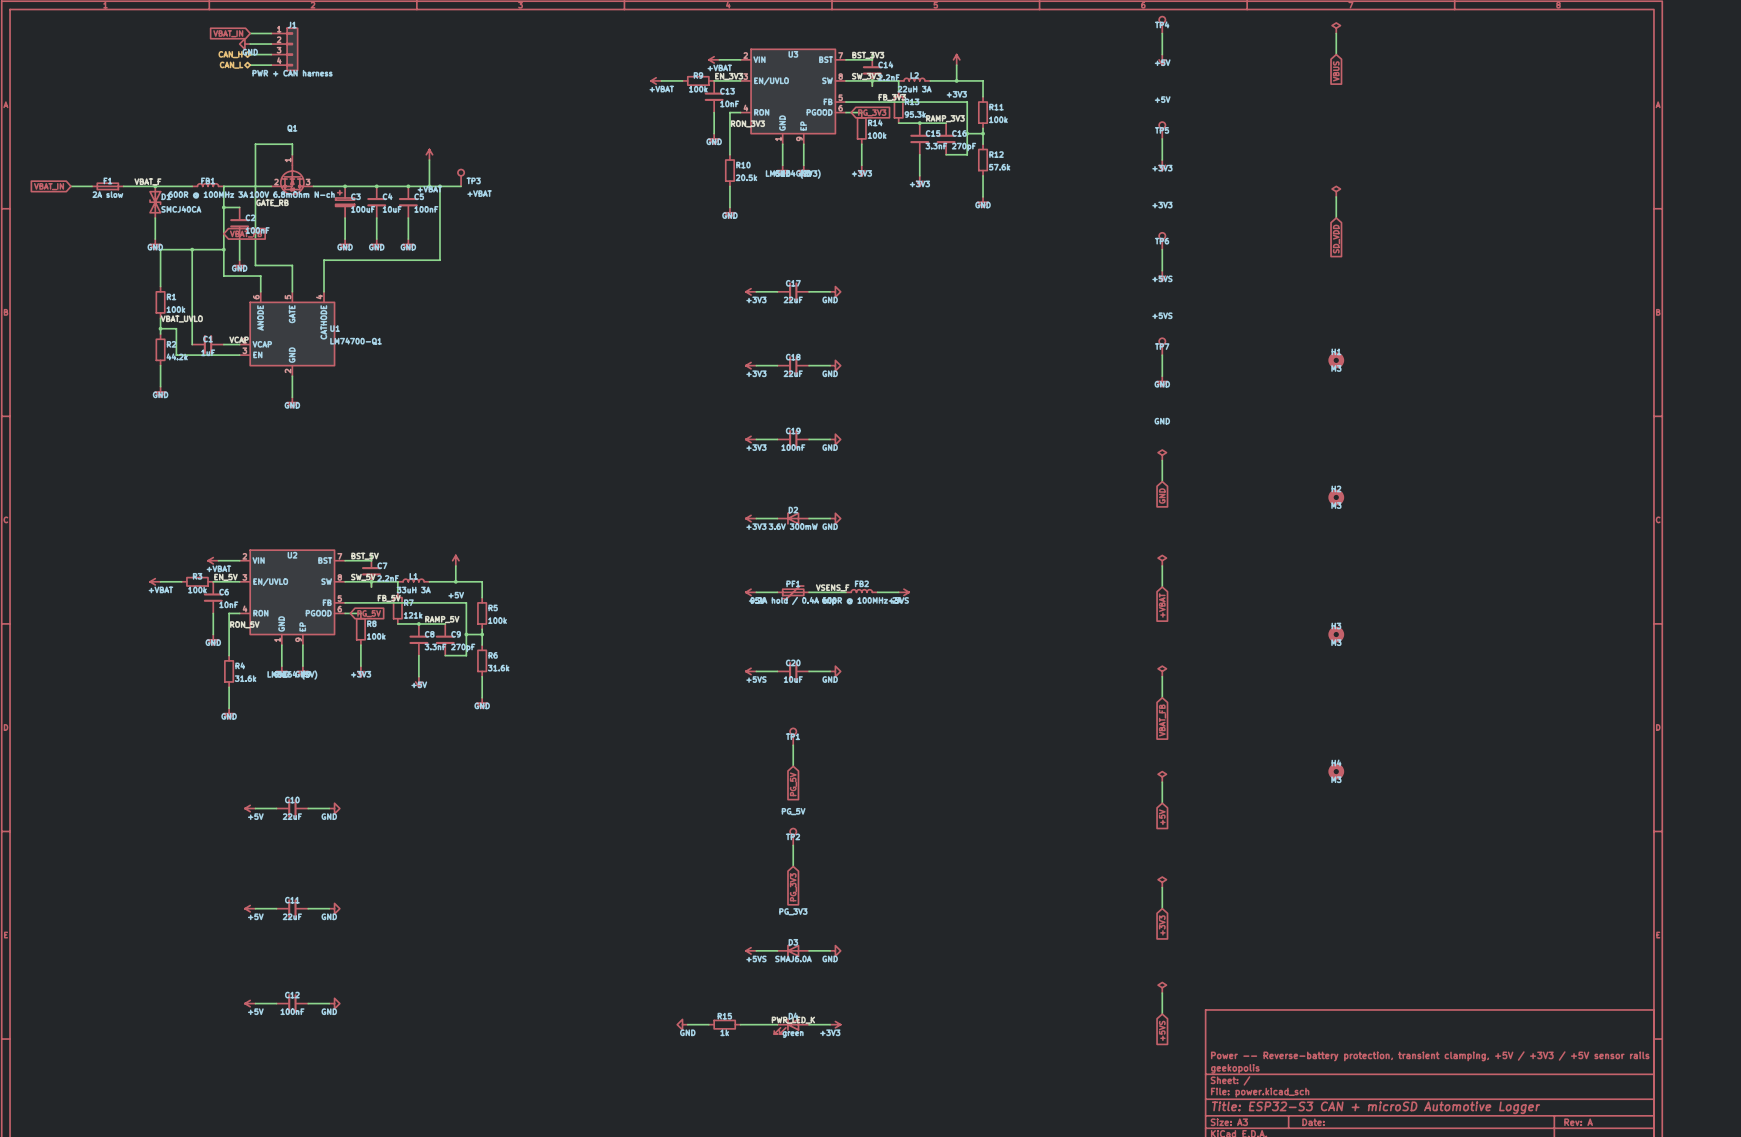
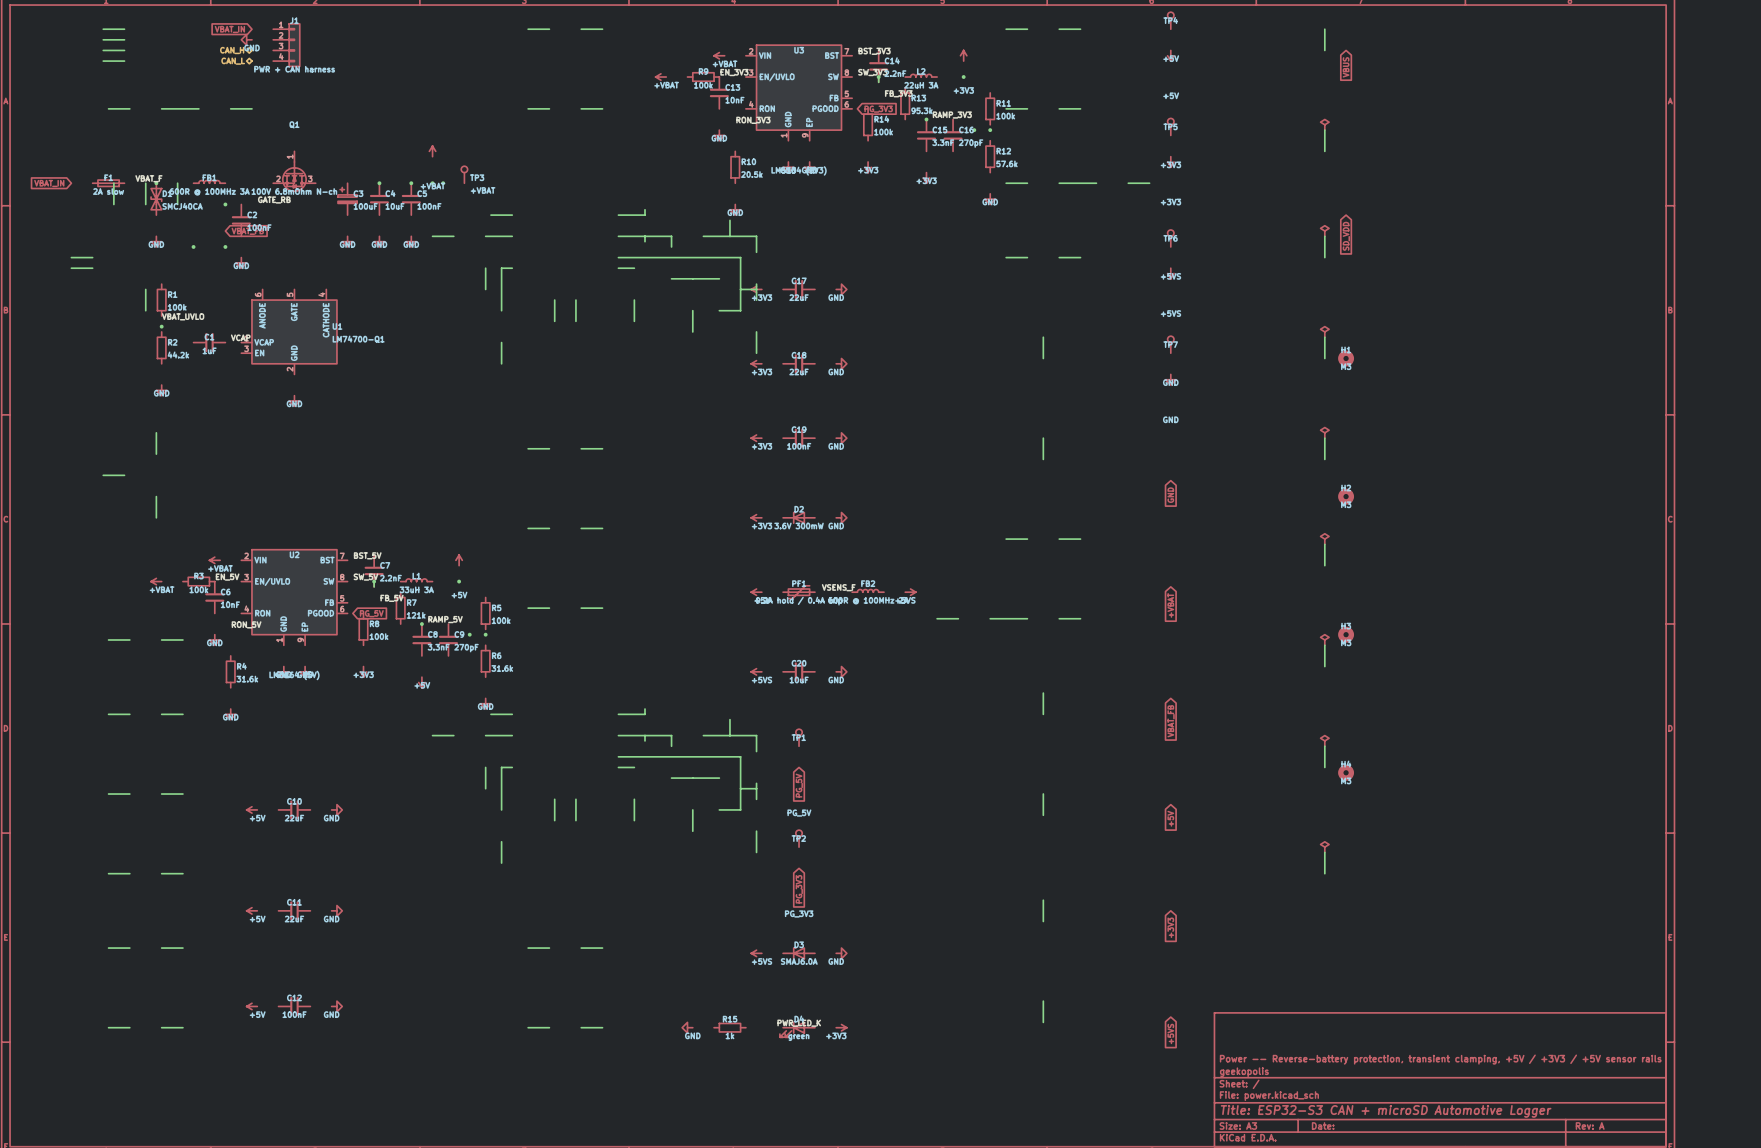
power symbol: (1336, 28) -> none
wire: none -> (103, 29) (124, 29)
wire: (250, 33) (271, 33) -> none
wire: none -> (528, 29) (549, 29)
wire: none -> (581, 29) (602, 29)
wire: none -> (1006, 29) (1027, 29)
wire: none -> (1059, 29) (1080, 29)
wire: (1162, 33) (1162, 54) -> none
wire: (1336, 33) (1336, 54) -> (1324, 29) (1324, 50)
wire: none -> (103, 39) (124, 39)
wire: (250, 44) (271, 44) -> none
wire: none -> (103, 50) (124, 50)
wire: (250, 54) (271, 54) -> none
wire: (872, 54) (872, 59) (845, 59) -> none
wire: (719, 59) (740, 59) -> none
wire: none -> (103, 61) (124, 61)
wire: (250, 65) (271, 65) -> (230, 108) (251, 108)
wire: (956, 65) (956, 80) -> none
wire: (661, 80) (682, 80) -> (581, 108) (602, 108)
wire: (714, 80) (740, 80) -> none
wire: (845, 80) (898, 80) (898, 91) -> none
wire: (930, 80) (983, 80) (983, 96) -> none
wire: (845, 102) (967, 102) (967, 154) (946, 154) -> none
wire: none -> (108, 108) (129, 108)
wire: none -> (161, 108) (198, 108)
wire: none -> (528, 108) (549, 108)
wire: (714, 112) (714, 133) -> none
wire: (740, 112) (729, 112) (729, 154) -> none
wire: (845, 112) (861, 112) -> none
wire: none -> (1006, 108) (1027, 108)
wire: none -> (1059, 108) (1080, 108)
wire: (898, 123) (946, 123) -> none
wire: (983, 128) (983, 144) -> none
power symbol: none -> (1324, 124)
wire: (967, 133) (983, 133) -> none
wire: none -> (1324, 130) (1324, 151)
wire: (1162, 138) (1162, 160) -> none
wire: (782, 144) (782, 165) -> none
wire: (803, 144) (803, 165) -> none
wire: (861, 144) (861, 165) -> none
wire: (292, 154) (292, 144) (255, 144) (255, 265) (292, 265) (292, 291) -> none
wire: (919, 154) (919, 175) -> none
wire: (429, 160) (429, 186) -> none
wire: (983, 175) (983, 196) -> none
wire: (70, 186) (92, 186) -> (71, 257) (92, 257)
wire: none -> (113, 183) (113, 204)
wire: (123, 186) (192, 186) -> none
wire: (271, 186) (223, 186) (223, 276) (260, 276) (260, 291) -> none
wire: (313, 186) (461, 186) -> none
junction: (345, 186) -> none
wire: (439, 186) (439, 260) (324, 260) (324, 291) -> none
wire: (729, 186) (729, 207) -> none
wire: none -> (1006, 183) (1027, 183)
wire: none -> (1059, 183) (1096, 183)
wire: none -> (1128, 183) (1149, 183)
power symbol: (1336, 191) -> none
wire: (1336, 196) (1336, 218) -> (1324, 236) (1324, 257)
wire: (223, 207) (239, 207) -> none
wire: none -> (644, 209) (644, 215) (618, 215)
wire: (155, 218) (155, 239) -> (145, 183) (145, 204)
wire: (345, 218) (345, 239) -> none
wire: (376, 218) (376, 239) -> none
wire: (408, 218) (408, 239) -> (485, 268) (485, 289)
wire: none -> (490, 215) (512, 215)
wire: none -> (729, 220) (729, 236)
power symbol: none -> (1324, 231)
wire: (239, 239) (239, 260) -> (177, 183) (177, 204)
wire: none -> (432, 236) (453, 236)
wire: none -> (485, 236) (512, 236)
wire: none -> (618, 236) (671, 236) (671, 246)
wire: none -> (644, 236) (644, 241)
wire: none -> (703, 236) (756, 236) (756, 252)
wire: (192, 249) (192, 344) -> none
wire: (223, 249) (160, 249) (160, 286) -> none
wire: (1162, 249) (1162, 270) -> none
wire: none -> (618, 257) (740, 257) (740, 310) (719, 310)
wire: none -> (1006, 257) (1027, 257)
wire: none -> (1059, 257) (1080, 257)
wire: none -> (71, 268) (92, 268)
wire: none -> (512, 268) (501, 268) (501, 310)
wire: none -> (618, 268) (634, 268)
wire: none -> (671, 278) (719, 278)
wire: none -> (756, 284) (756, 300)
wire: none -> (145, 289) (145, 310)
wire: none -> (740, 289) (756, 289)
wire: (756, 291) (777, 291) -> none
wire: (809, 291) (830, 291) -> none
wire: none -> (554, 300) (554, 321)
wire: none -> (575, 300) (575, 321)
wire: none -> (634, 300) (634, 321)
wire: none -> (692, 310) (692, 331)
wire: (160, 318) (160, 334) -> none
wire: (160, 328) (176, 328) (176, 355) (239, 355) -> none
wire: none -> (756, 331) (756, 353)
power symbol: none -> (1324, 331)
wire: none -> (1043, 337) (1043, 358)
wire: none -> (1324, 337) (1324, 358)
wire: (223, 344) (239, 344) -> none
wire: none -> (501, 342) (501, 363)
wire: (1162, 355) (1162, 376) -> none
wire: (160, 365) (160, 386) -> (156, 432) (156, 454)
wire: (756, 365) (777, 365) -> none
wire: (809, 365) (830, 365) -> none
wire: (292, 376) (292, 397) -> none
power symbol: none -> (1324, 432)
wire: (756, 439) (777, 439) -> none
wire: (809, 439) (830, 439) -> none
wire: none -> (1043, 438) (1043, 459)
wire: none -> (1324, 438) (1324, 459)
wire: none -> (528, 448) (549, 448)
wire: none -> (581, 448) (602, 448)
power symbol: (1162, 455) -> none
wire: (1162, 460) (1162, 481) -> none
wire: none -> (103, 475) (124, 475)
wire: none -> (156, 496) (156, 517)
wire: (756, 518) (777, 518) -> none
wire: (809, 518) (830, 518) -> none
wire: none -> (528, 528) (549, 528)
wire: none -> (581, 528) (602, 528)
wire: none -> (1006, 539) (1027, 539)
wire: none -> (1059, 539) (1080, 539)
power symbol: none -> (1324, 539)
wire: none -> (1324, 544) (1324, 565)
wire: (371, 555) (371, 560) (345, 560) -> none
wire: (218, 560) (239, 560) -> none
power symbol: (1162, 560) -> none
wire: (455, 565) (455, 581) -> none
wire: (1162, 565) (1162, 587) -> none
wire: (160, 581) (181, 581) -> (161, 639) (182, 639)
wire: (213, 581) (239, 581) -> none
wire: (345, 581) (397, 581) (397, 592) -> none
wire: (429, 581) (482, 581) (482, 597) -> none
wire: (756, 592) (777, 592) -> none
wire: (809, 592) (845, 592) -> none
wire: (877, 592) (898, 592) -> (937, 618) (958, 618)
wire: (345, 602) (466, 602) (466, 655) (445, 655) -> none
wire: none -> (528, 608) (549, 608)
wire: none -> (581, 608) (602, 608)
wire: (213, 613) (213, 634) -> none
wire: (239, 613) (229, 613) (229, 655) -> none
wire: (345, 613) (360, 613) -> none
wire: none -> (990, 618) (1027, 618)
wire: none -> (1059, 618) (1080, 618)
wire: (397, 623) (445, 623) -> none
wire: (482, 629) (482, 645) -> none
wire: (466, 634) (482, 634) -> none
wire: none -> (108, 639) (129, 639)
power symbol: none -> (1324, 639)
wire: (281, 645) (281, 666) -> none
wire: (302, 645) (302, 666) -> none
wire: (360, 645) (360, 666) -> none
wire: none -> (1324, 645) (1324, 666)
wire: (418, 655) (418, 676) -> none
wire: (756, 671) (777, 671) -> none
wire: (809, 671) (830, 671) -> none
power symbol: (1162, 671) -> none
wire: (482, 676) (482, 697) -> (485, 767) (485, 788)
wire: (1162, 676) (1162, 697) -> none
wire: (229, 687) (229, 708) -> none
wire: none -> (1043, 693) (1043, 714)
wire: none -> (644, 709) (644, 714) (618, 714)
wire: none -> (108, 714) (129, 714)
wire: none -> (161, 714) (182, 714)
wire: none -> (490, 714) (512, 714)
wire: none -> (729, 719) (729, 735)
wire: none -> (432, 735) (453, 735)
wire: none -> (485, 735) (512, 735)
wire: none -> (618, 735) (671, 735) (671, 746)
wire: none -> (644, 735) (644, 740)
wire: none -> (703, 735) (756, 735) (756, 751)
power symbol: none -> (1324, 740)
wire: (793, 745) (793, 766) -> none
wire: none -> (1324, 746) (1324, 767)
wire: none -> (618, 756) (740, 756) (740, 809) (719, 809)
wire: none -> (512, 767) (501, 767) (501, 809)
wire: none -> (618, 767) (634, 767)
wire: none -> (671, 778) (719, 778)
power symbol: (1162, 776) -> none
wire: none -> (756, 783) (756, 799)
wire: (1162, 782) (1162, 803) -> none
wire: none -> (740, 788) (756, 788)
wire: none -> (108, 794) (129, 794)
wire: none -> (1043, 794) (1043, 815)
wire: none -> (554, 799) (554, 820)
wire: none -> (575, 799) (575, 820)
wire: none -> (634, 799) (634, 820)
wire: (255, 808) (276, 808) -> (161, 794) (182, 794)
wire: (308, 808) (329, 808) -> none
wire: none -> (692, 809) (692, 831)
wire: none -> (501, 841) (501, 863)
wire: (793, 845) (793, 866) -> (756, 831) (756, 852)
power symbol: none -> (1324, 847)
wire: none -> (1324, 852) (1324, 873)
wire: none -> (108, 873) (129, 873)
power symbol: (1162, 882) -> none
wire: (1162, 887) (1162, 908) -> none
wire: none -> (1043, 900) (1043, 921)
wire: (255, 908) (276, 908) -> (161, 873) (182, 873)
wire: (308, 908) (329, 908) -> none
wire: none -> (108, 948) (129, 948)
wire: none -> (161, 948) (182, 948)
wire: none -> (528, 948) (549, 948)
wire: none -> (581, 948) (602, 948)
wire: (756, 950) (777, 950) -> none
wire: (809, 950) (830, 950) -> none
power symbol: (1162, 987) -> none
wire: (1162, 993) (1162, 1014) -> none
wire: none -> (1043, 1001) (1043, 1022)
wire: (255, 1003) (276, 1003) -> (161, 1027) (182, 1027)
wire: (308, 1003) (329, 1003) -> none
wire: none -> (108, 1027) (129, 1027)
wire: none -> (528, 1027) (549, 1027)
wire: none -> (581, 1027) (602, 1027)
wire: (687, 1024) (708, 1024) -> none
wire: (740, 1024) (777, 1024) -> none
wire: (809, 1024) (830, 1024) -> none

